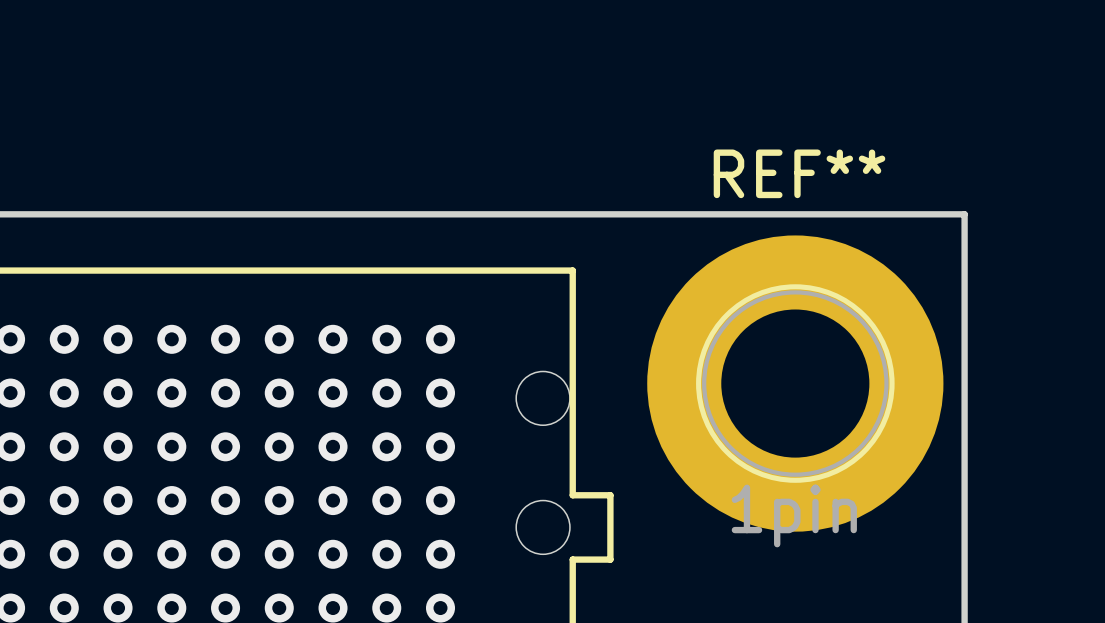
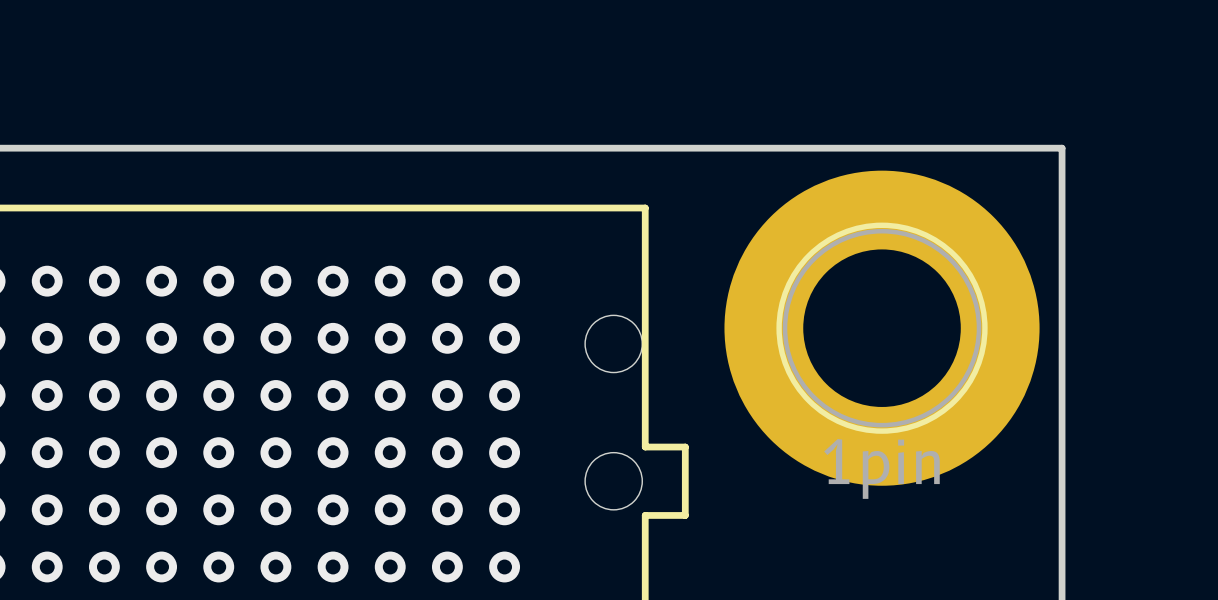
REF** name: REF** (799, 173) -> none

